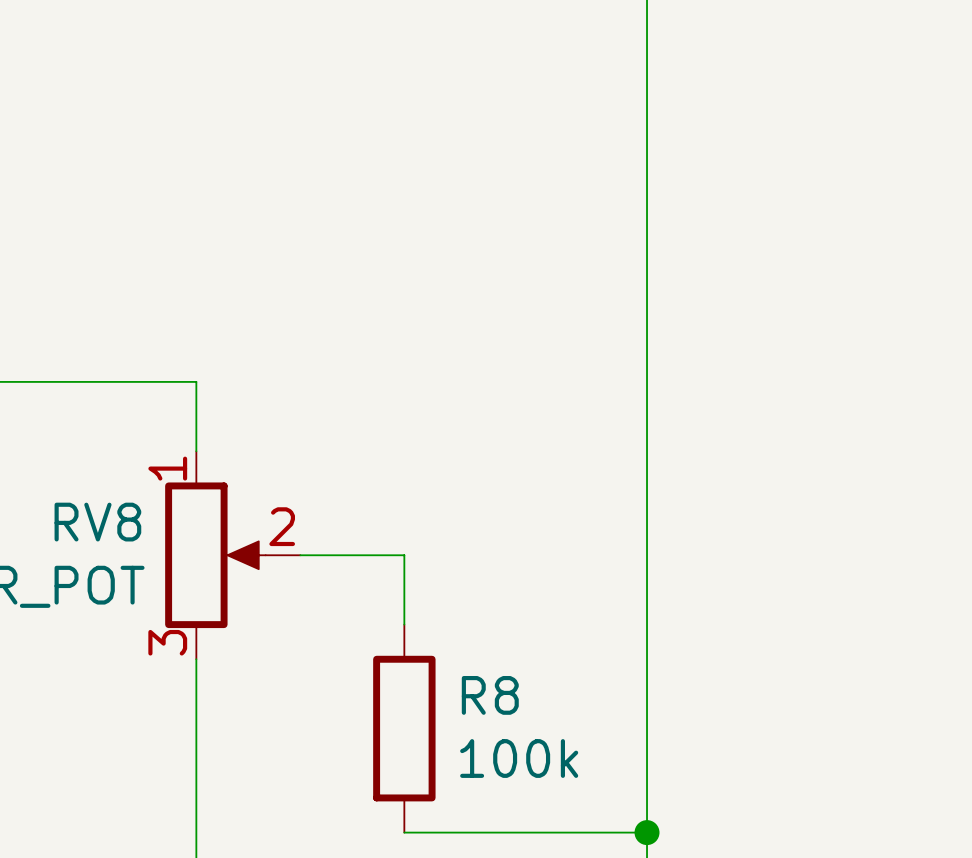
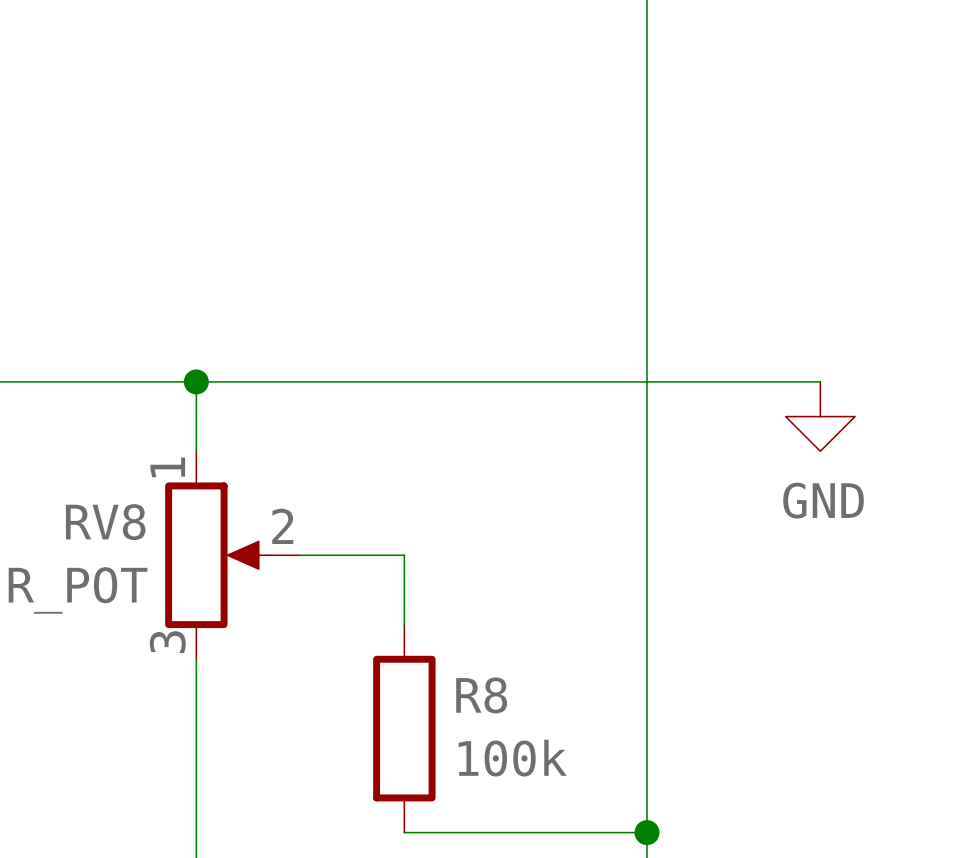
wire: none -> (196, 381) (820, 381)
junction: none -> (196, 381)
power symbol: none -> GND (820, 416)

